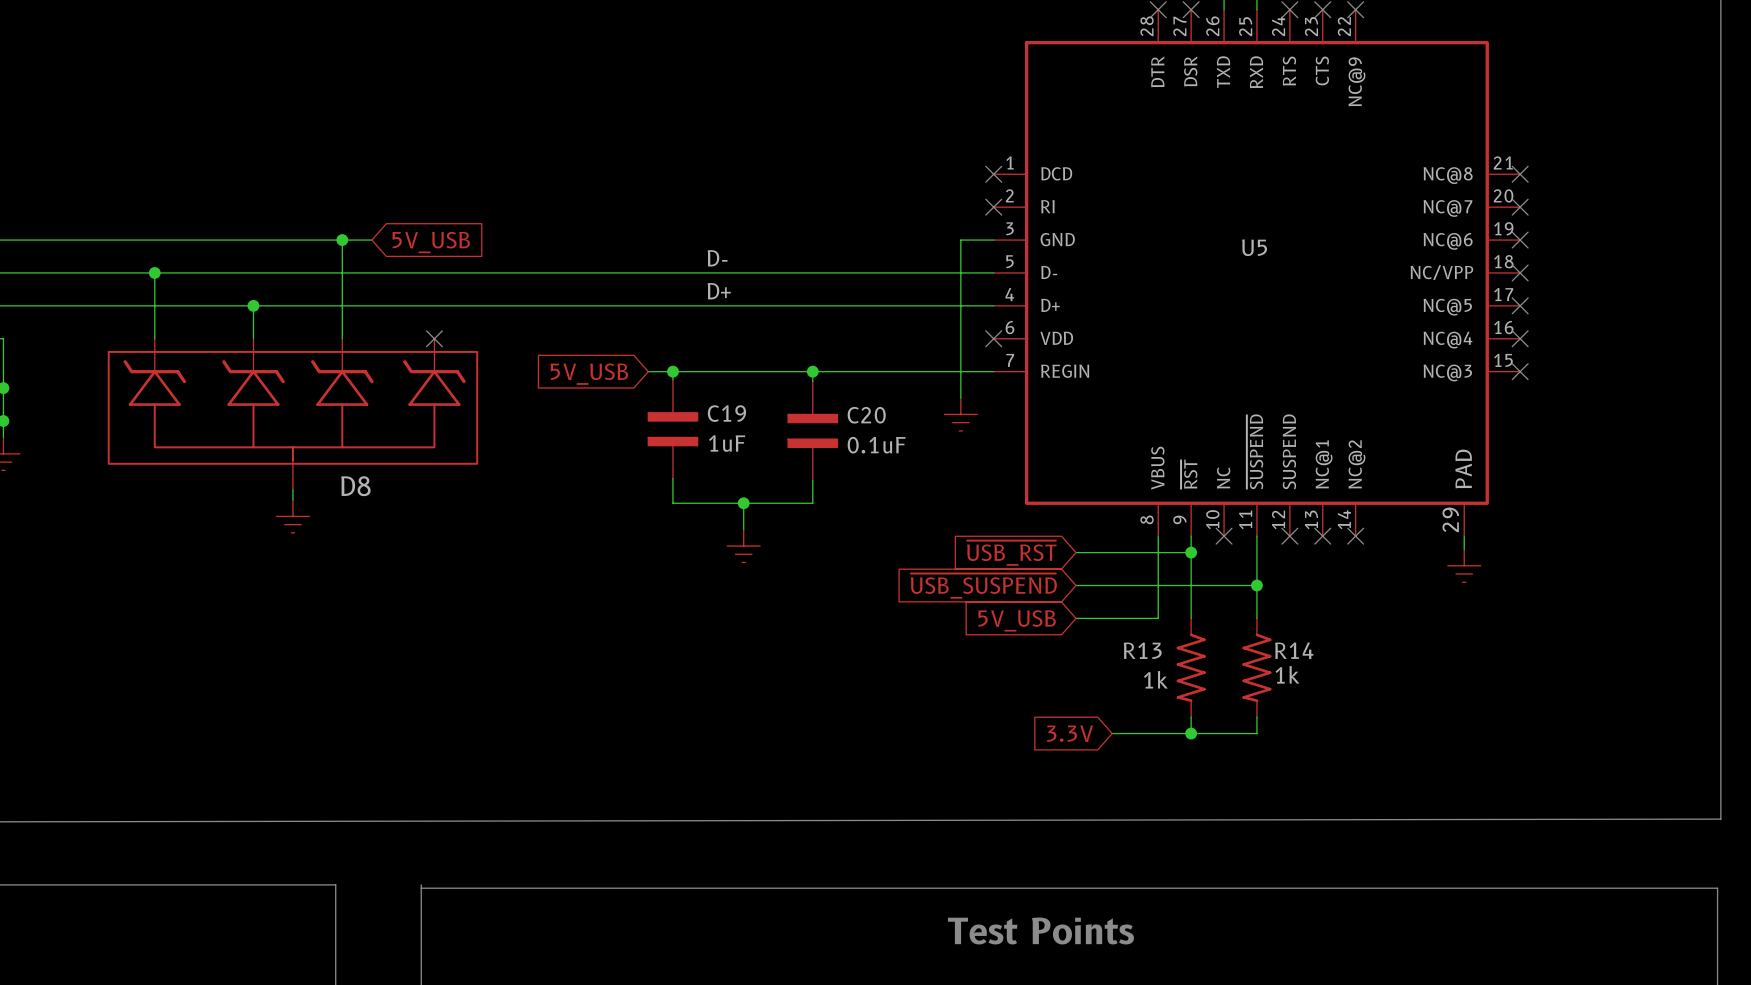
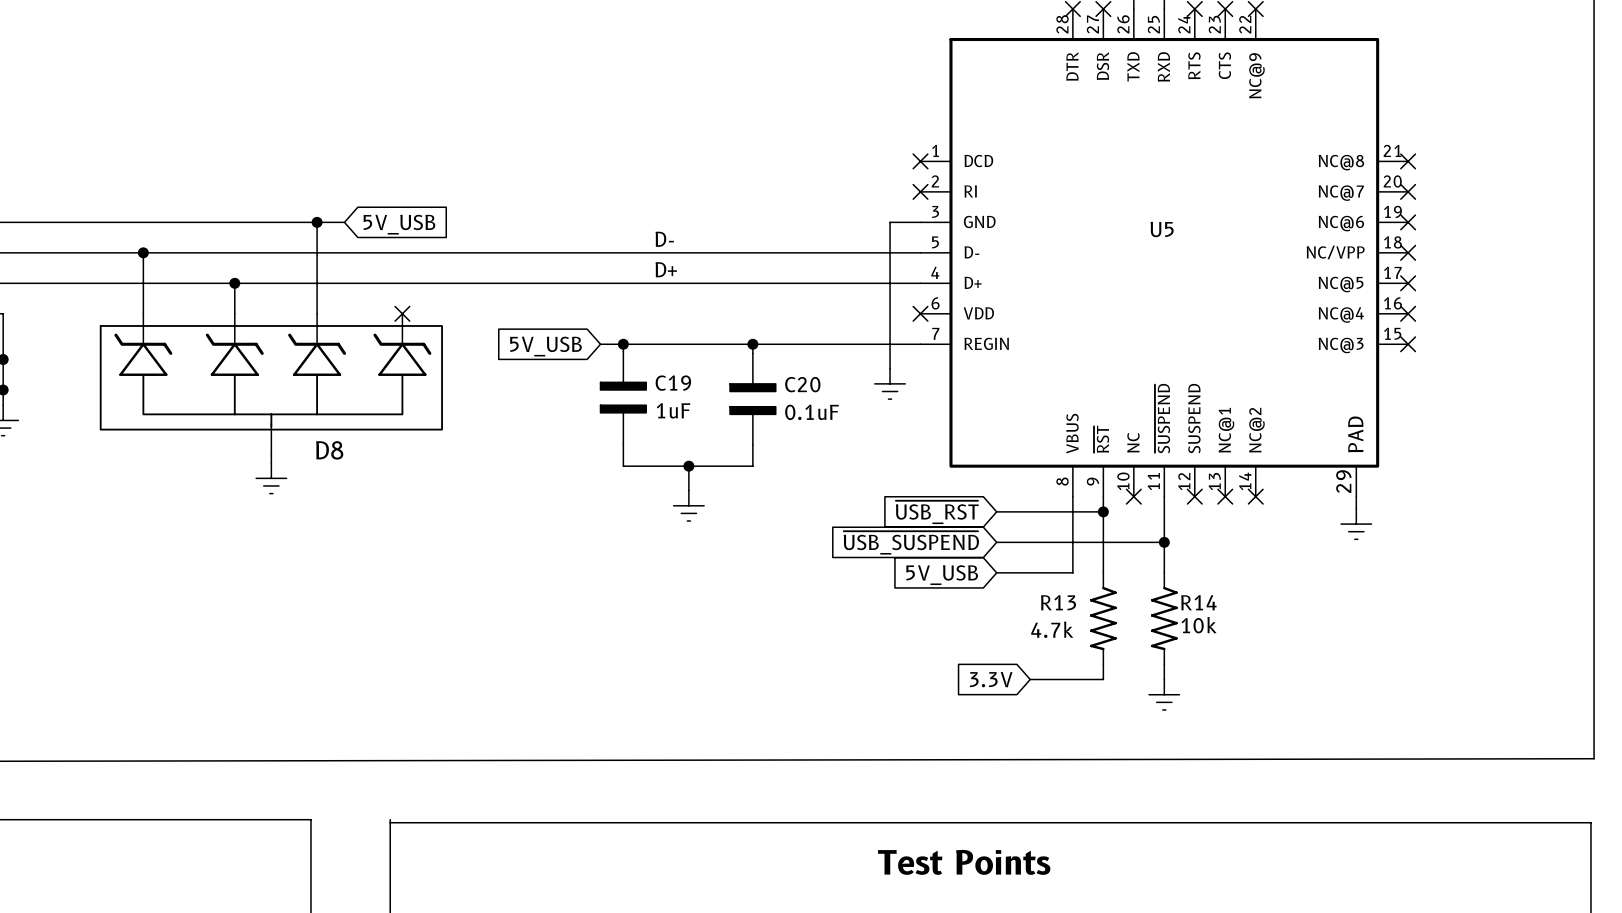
R14 value: 1k (1287, 674) -> 10k (1199, 625)
R13 value: 1k (1155, 679) -> 4.7k (1052, 629)
wire: (1191, 733) (1256, 733) -> none
junction: (1191, 733) -> none
power symbol: none -> (1164, 694)

